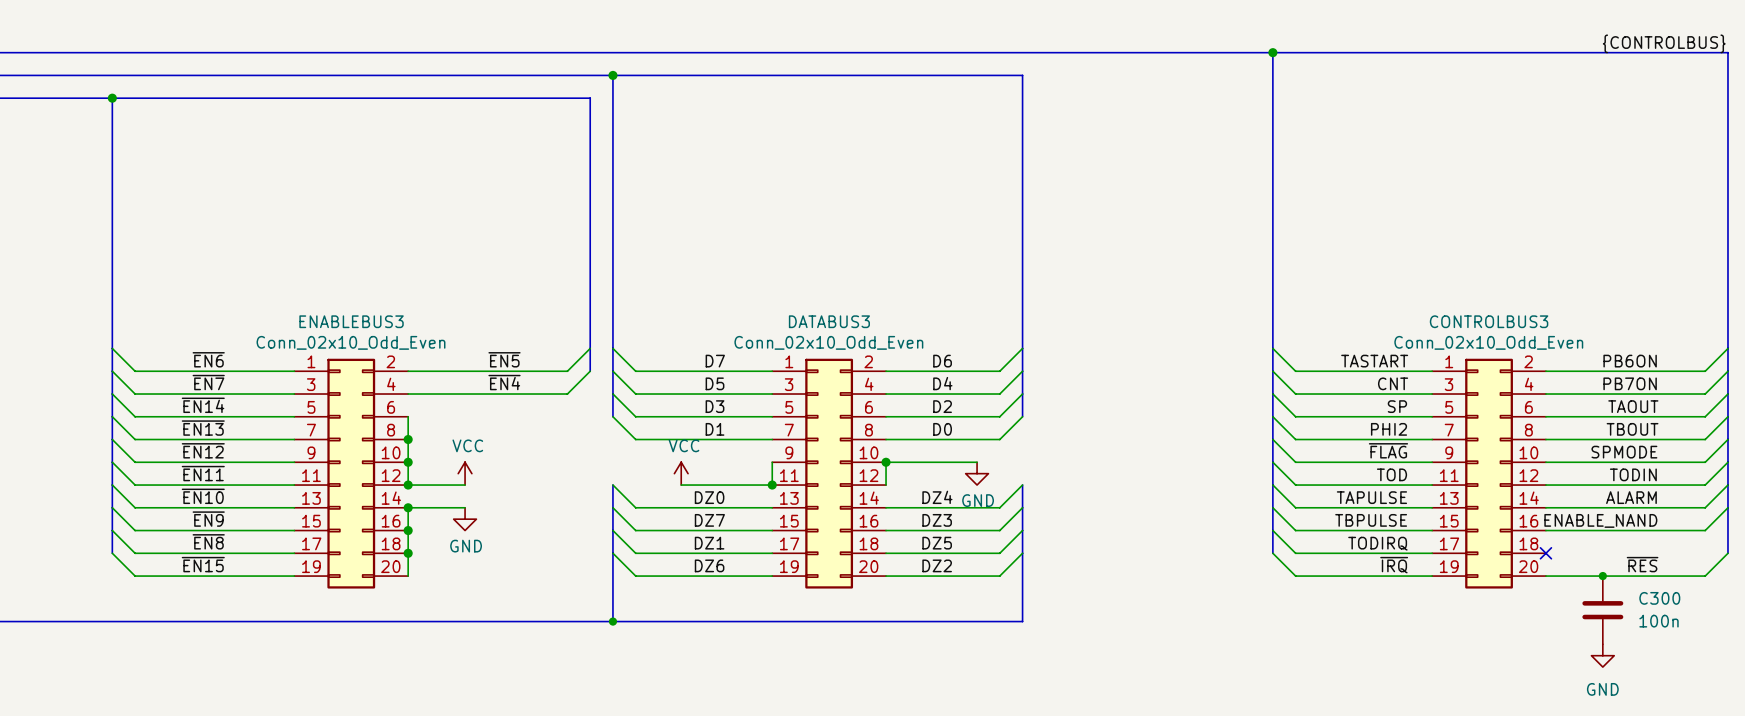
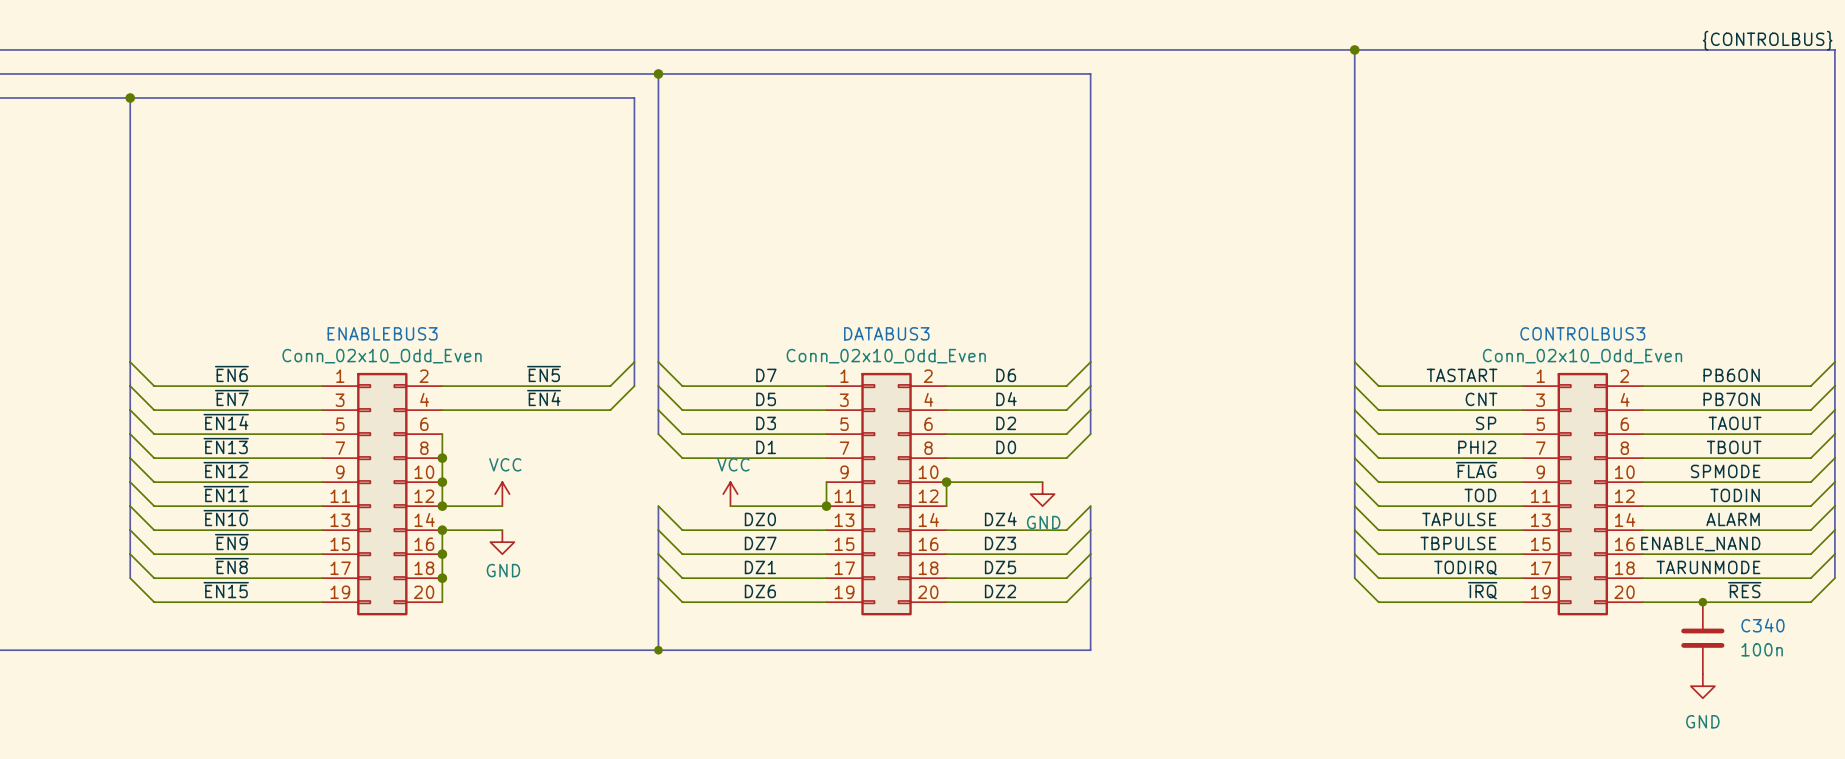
wire: none -> (1834, 554) (1810, 578) (1642, 578)
label: none -> TARUNMODE (1708, 567)
no-connect mark: (1545, 553) -> none
C300 name: C300 (1659, 598) -> C340 (1762, 625)

